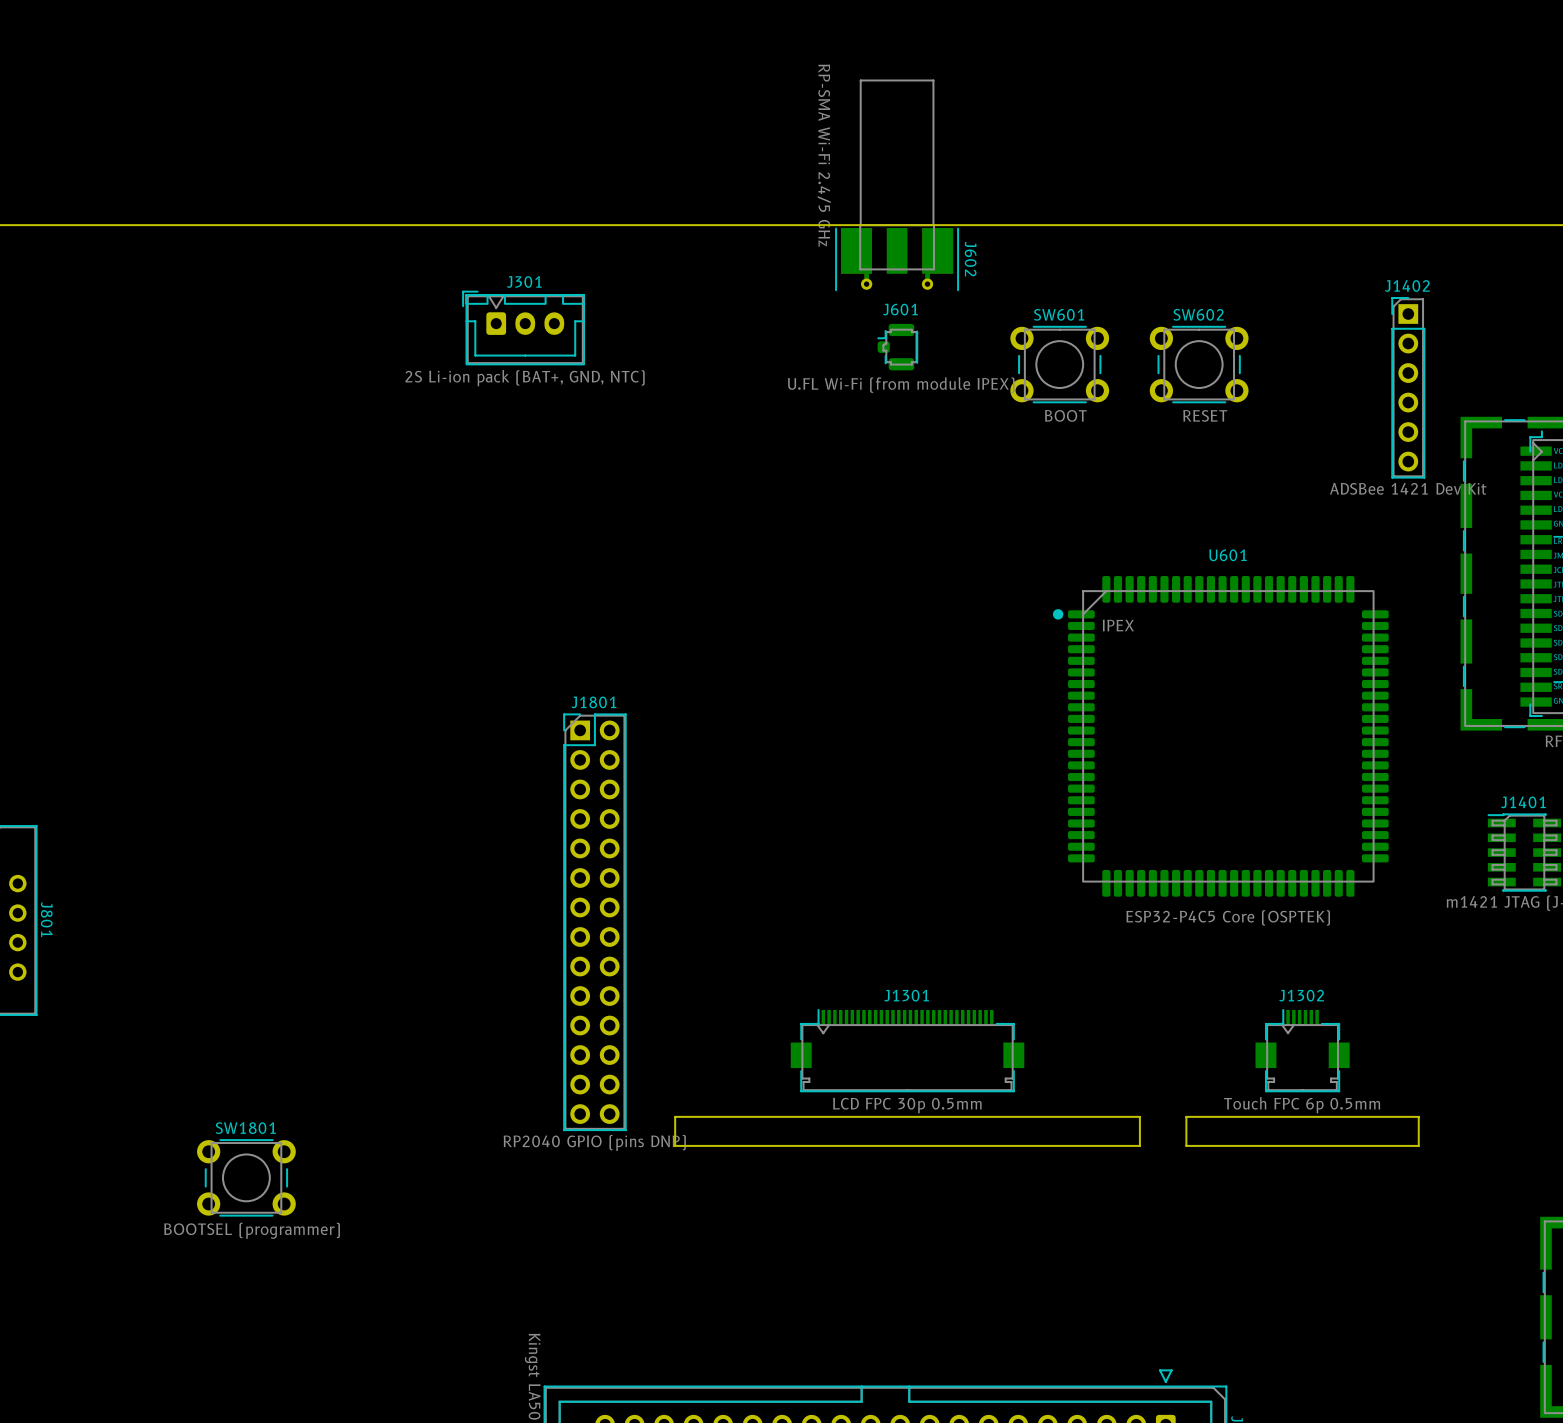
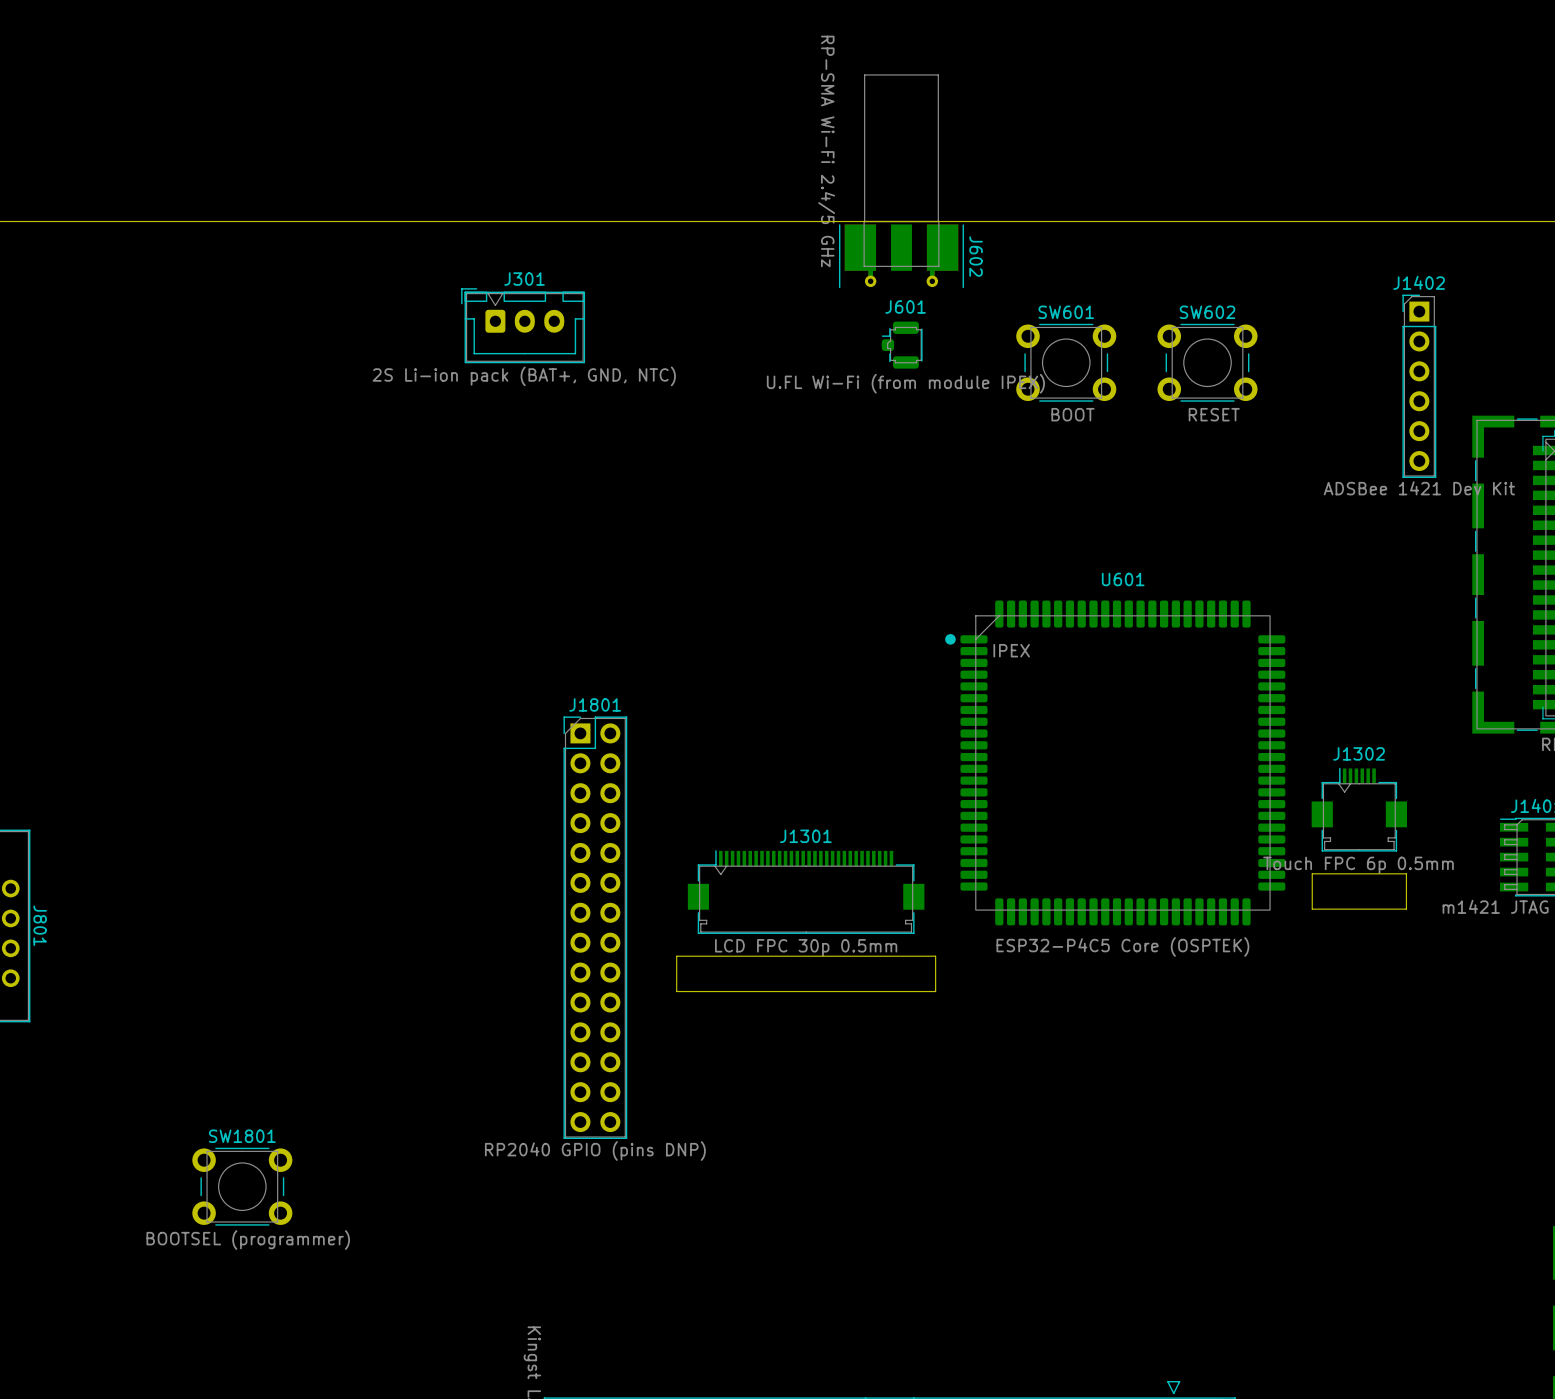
U601 position: (1220, 736) -> (1115, 762)
board edge: none -> (1406, 873) (1312, 873) (1312, 909) (1406, 909) (1406, 873)
board edge: none -> (935, 956) (676, 956) (676, 991) (935, 991) (935, 956)
J1301 position: (907, 1050) -> (806, 892)
J1302 position: (1302, 1050) -> (1359, 809)
board edge: (1139, 1116) (675, 1116) (675, 1145) (1139, 1145) (1139, 1116) -> none
board edge: (1418, 1116) (1186, 1116) (1186, 1145) (1418, 1145) (1418, 1116) -> none

